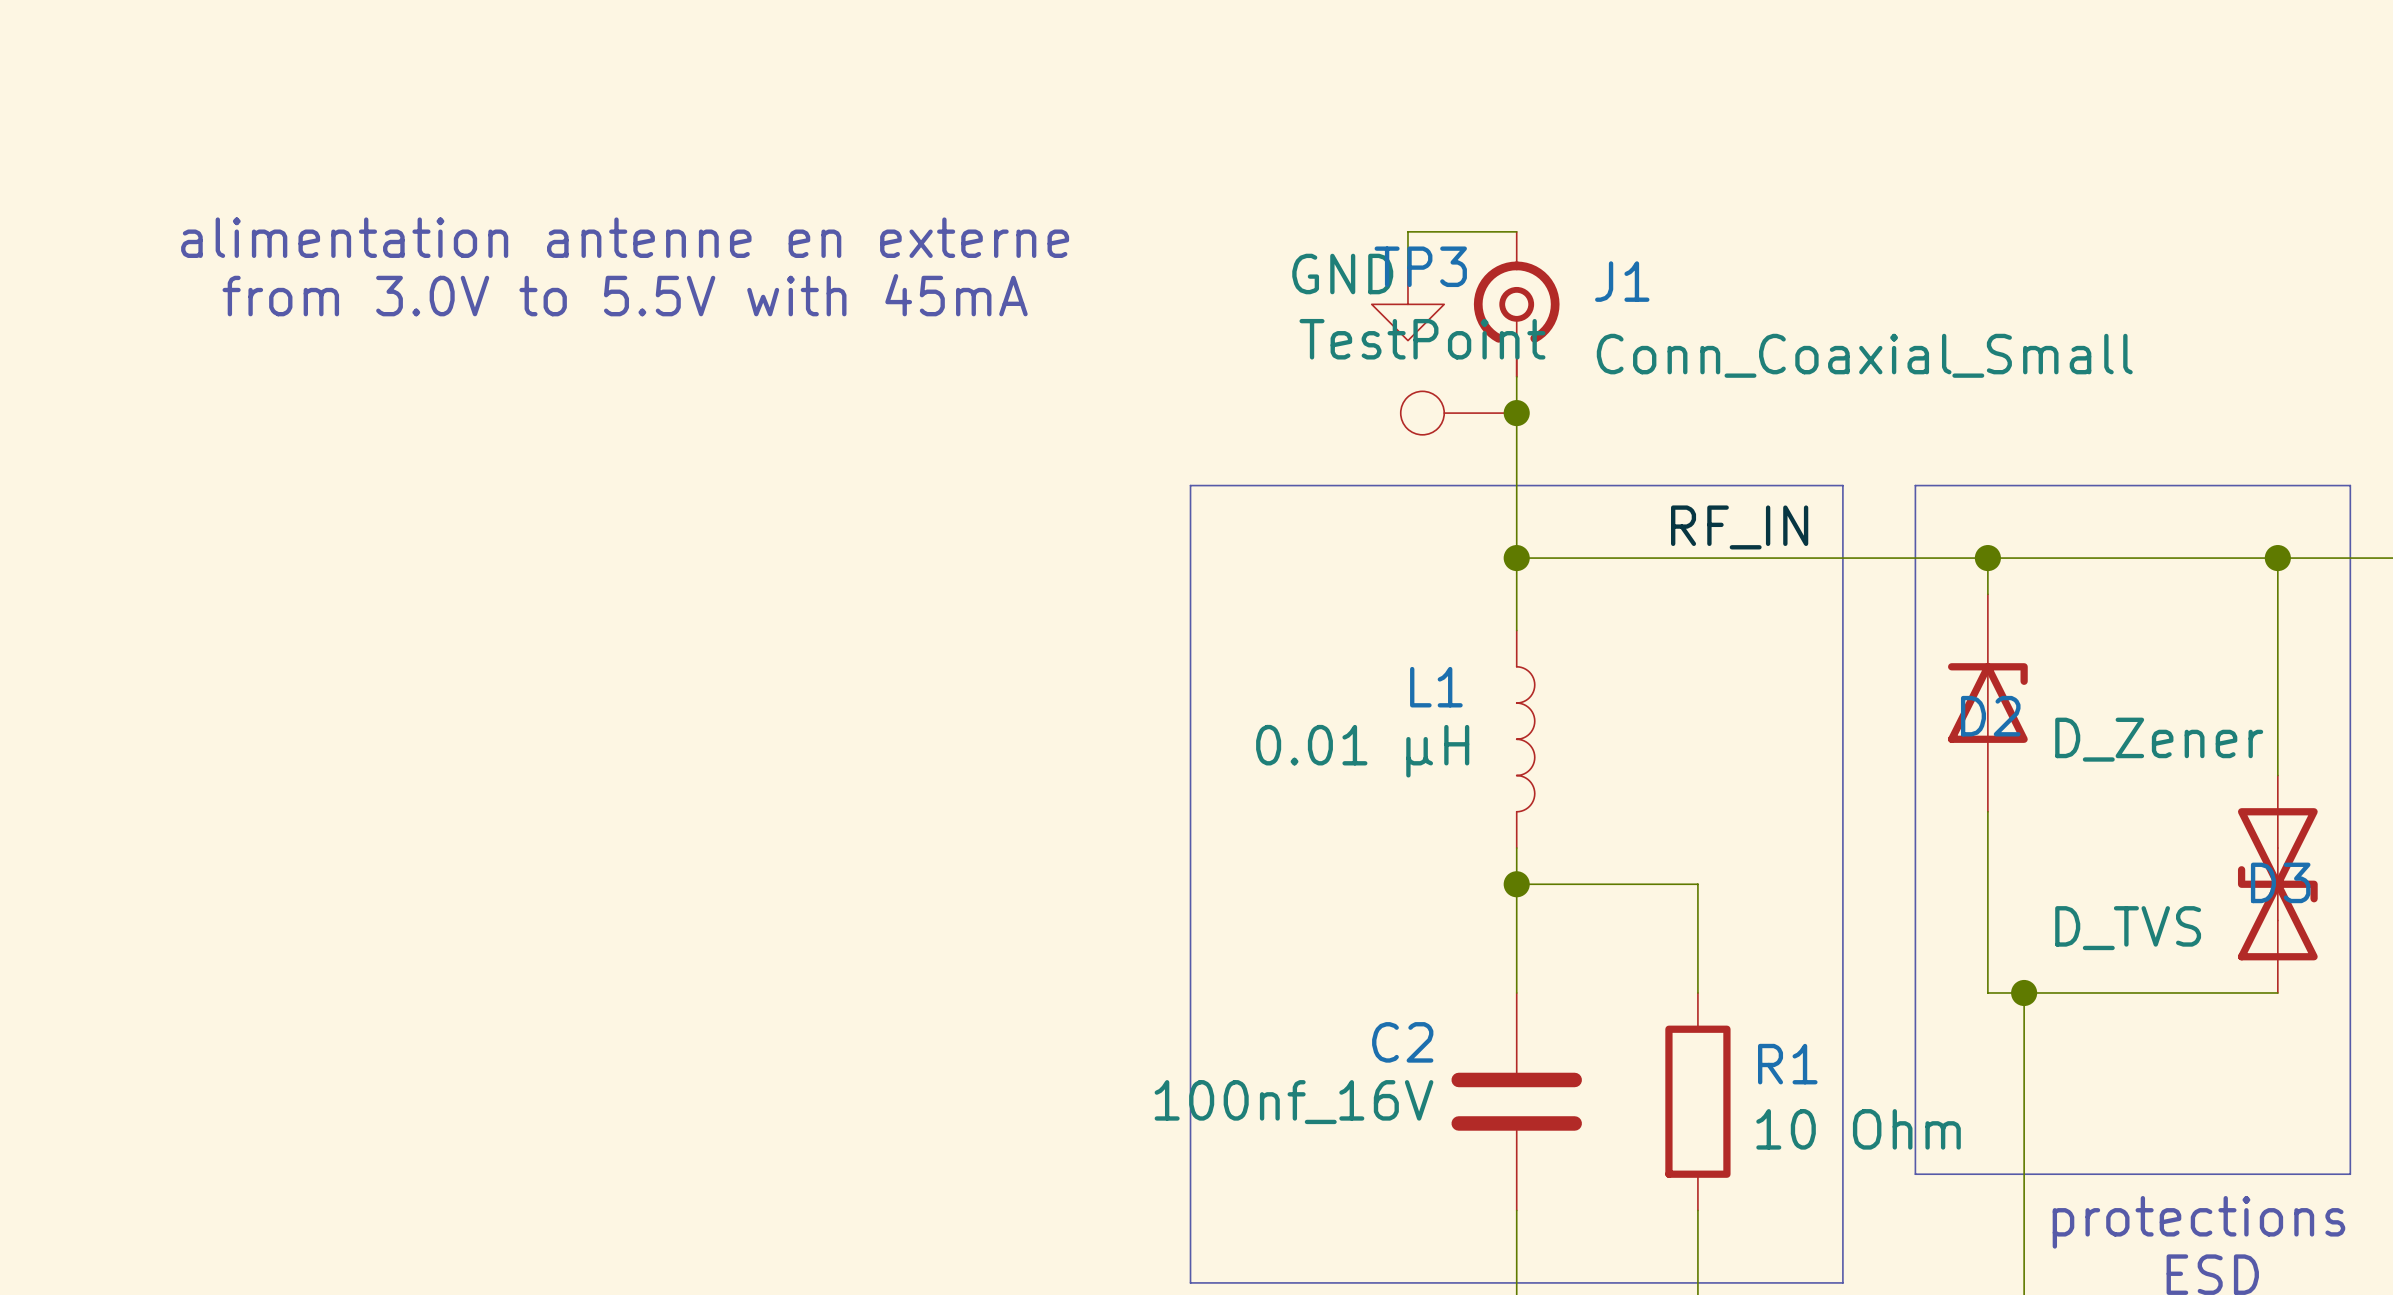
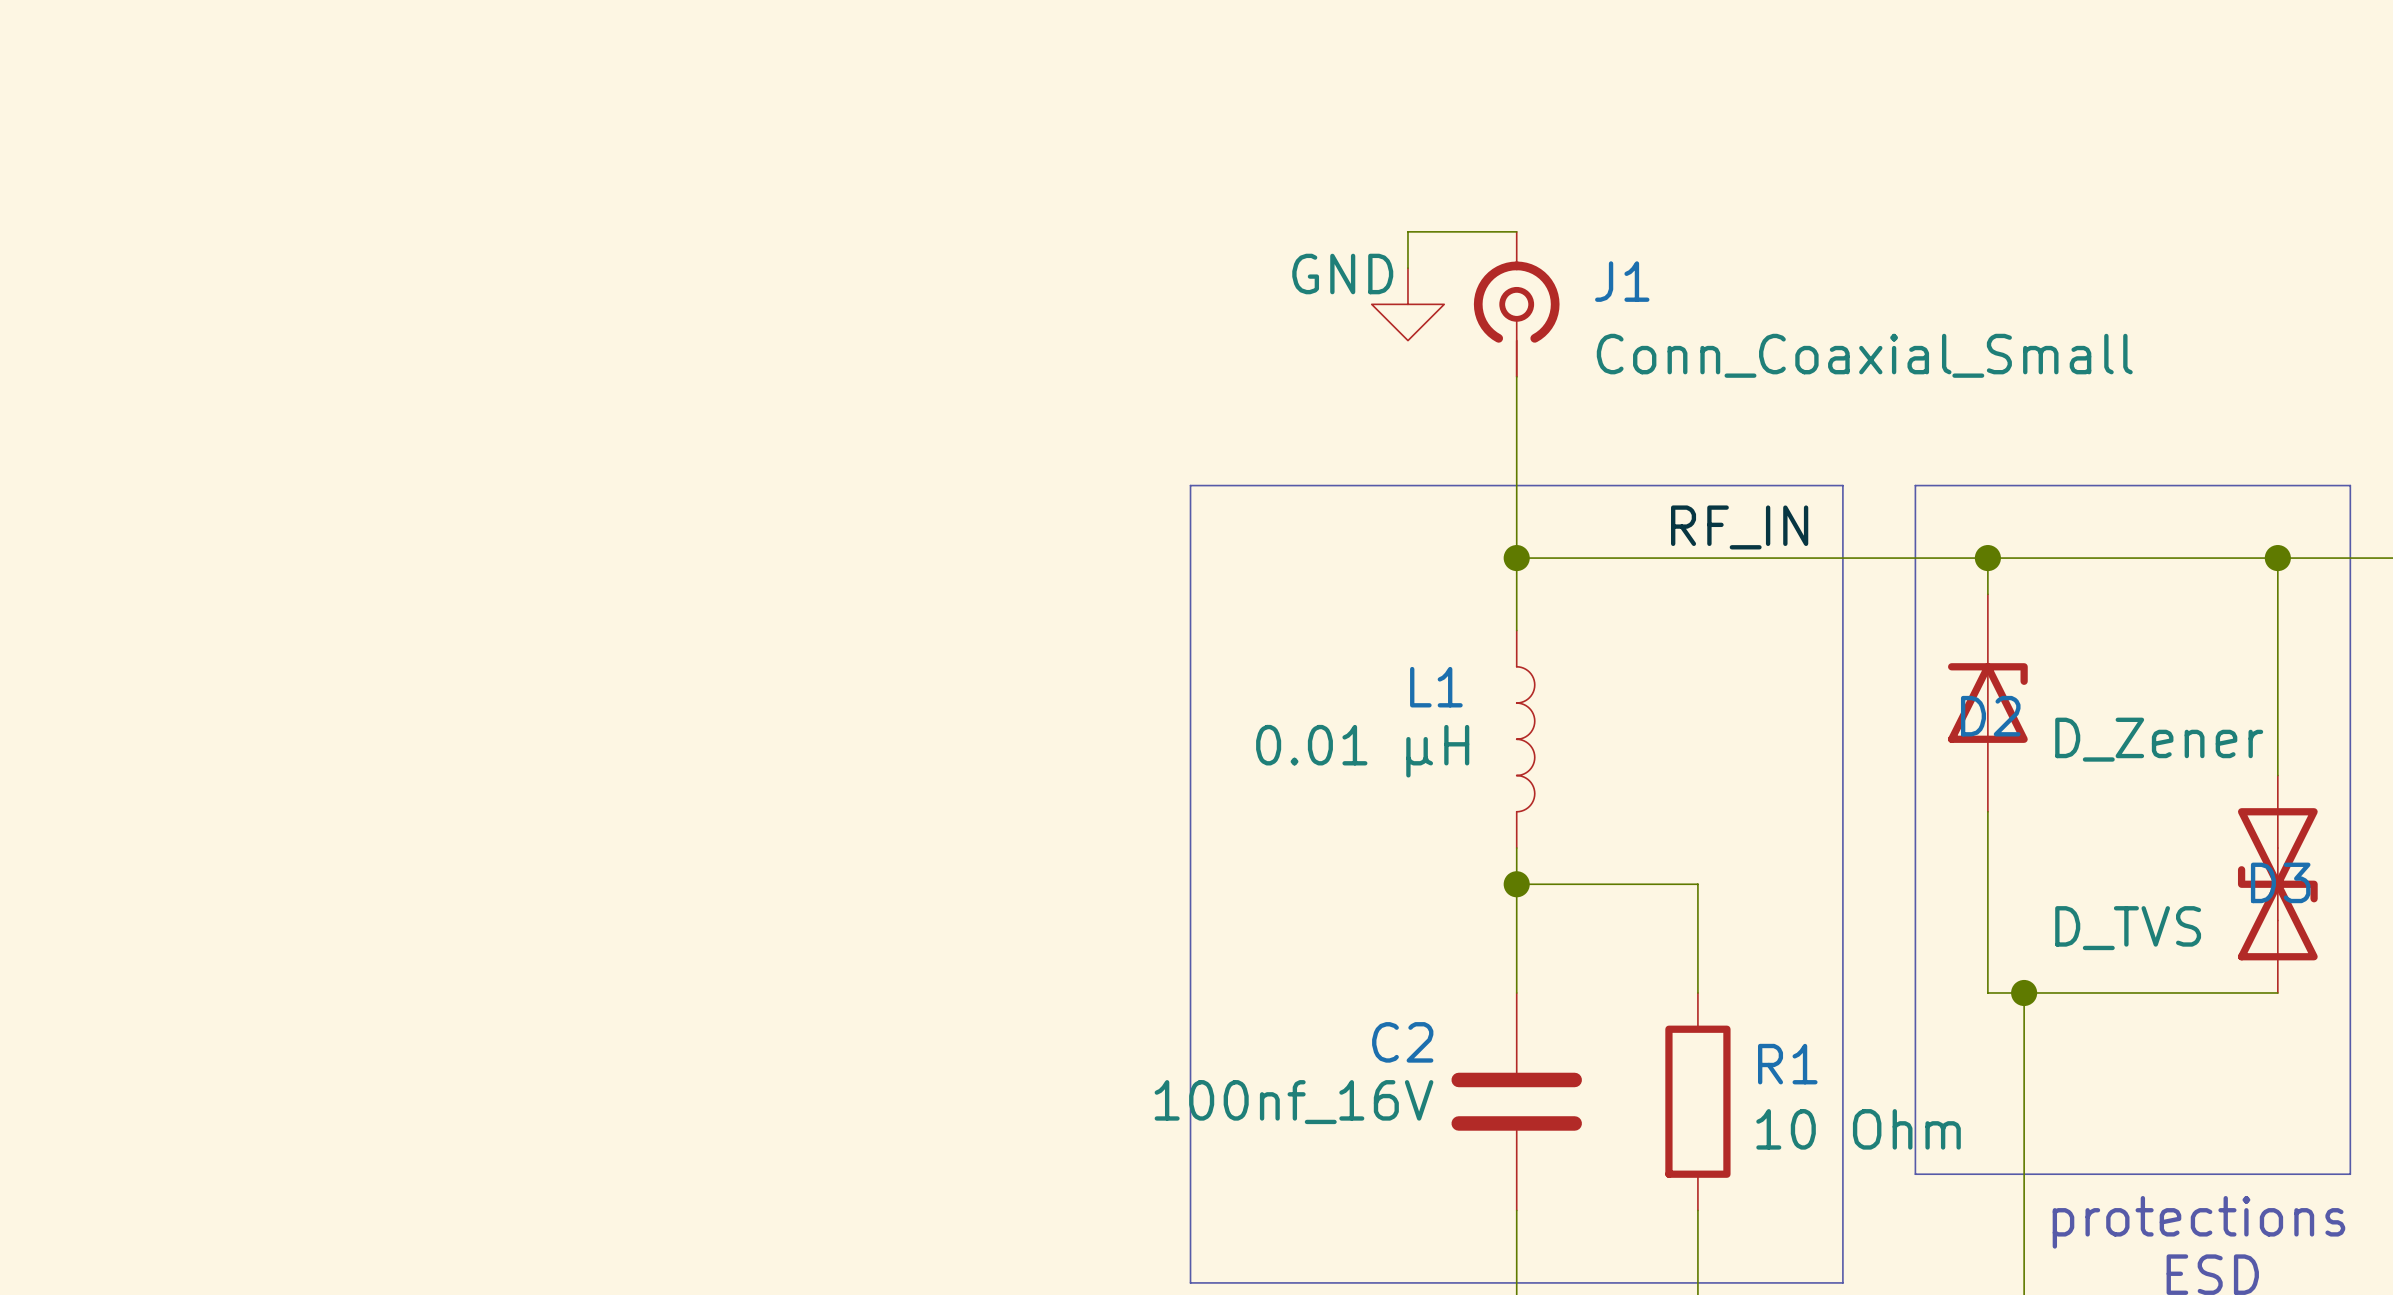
text: alimentation antenne en externe (625, 237) -> none
text: from 3.0V to 5.5V with 45mA (625, 295) -> none
TP3: TestPoint (1458, 413) -> none
junction: (1516, 413) -> none

